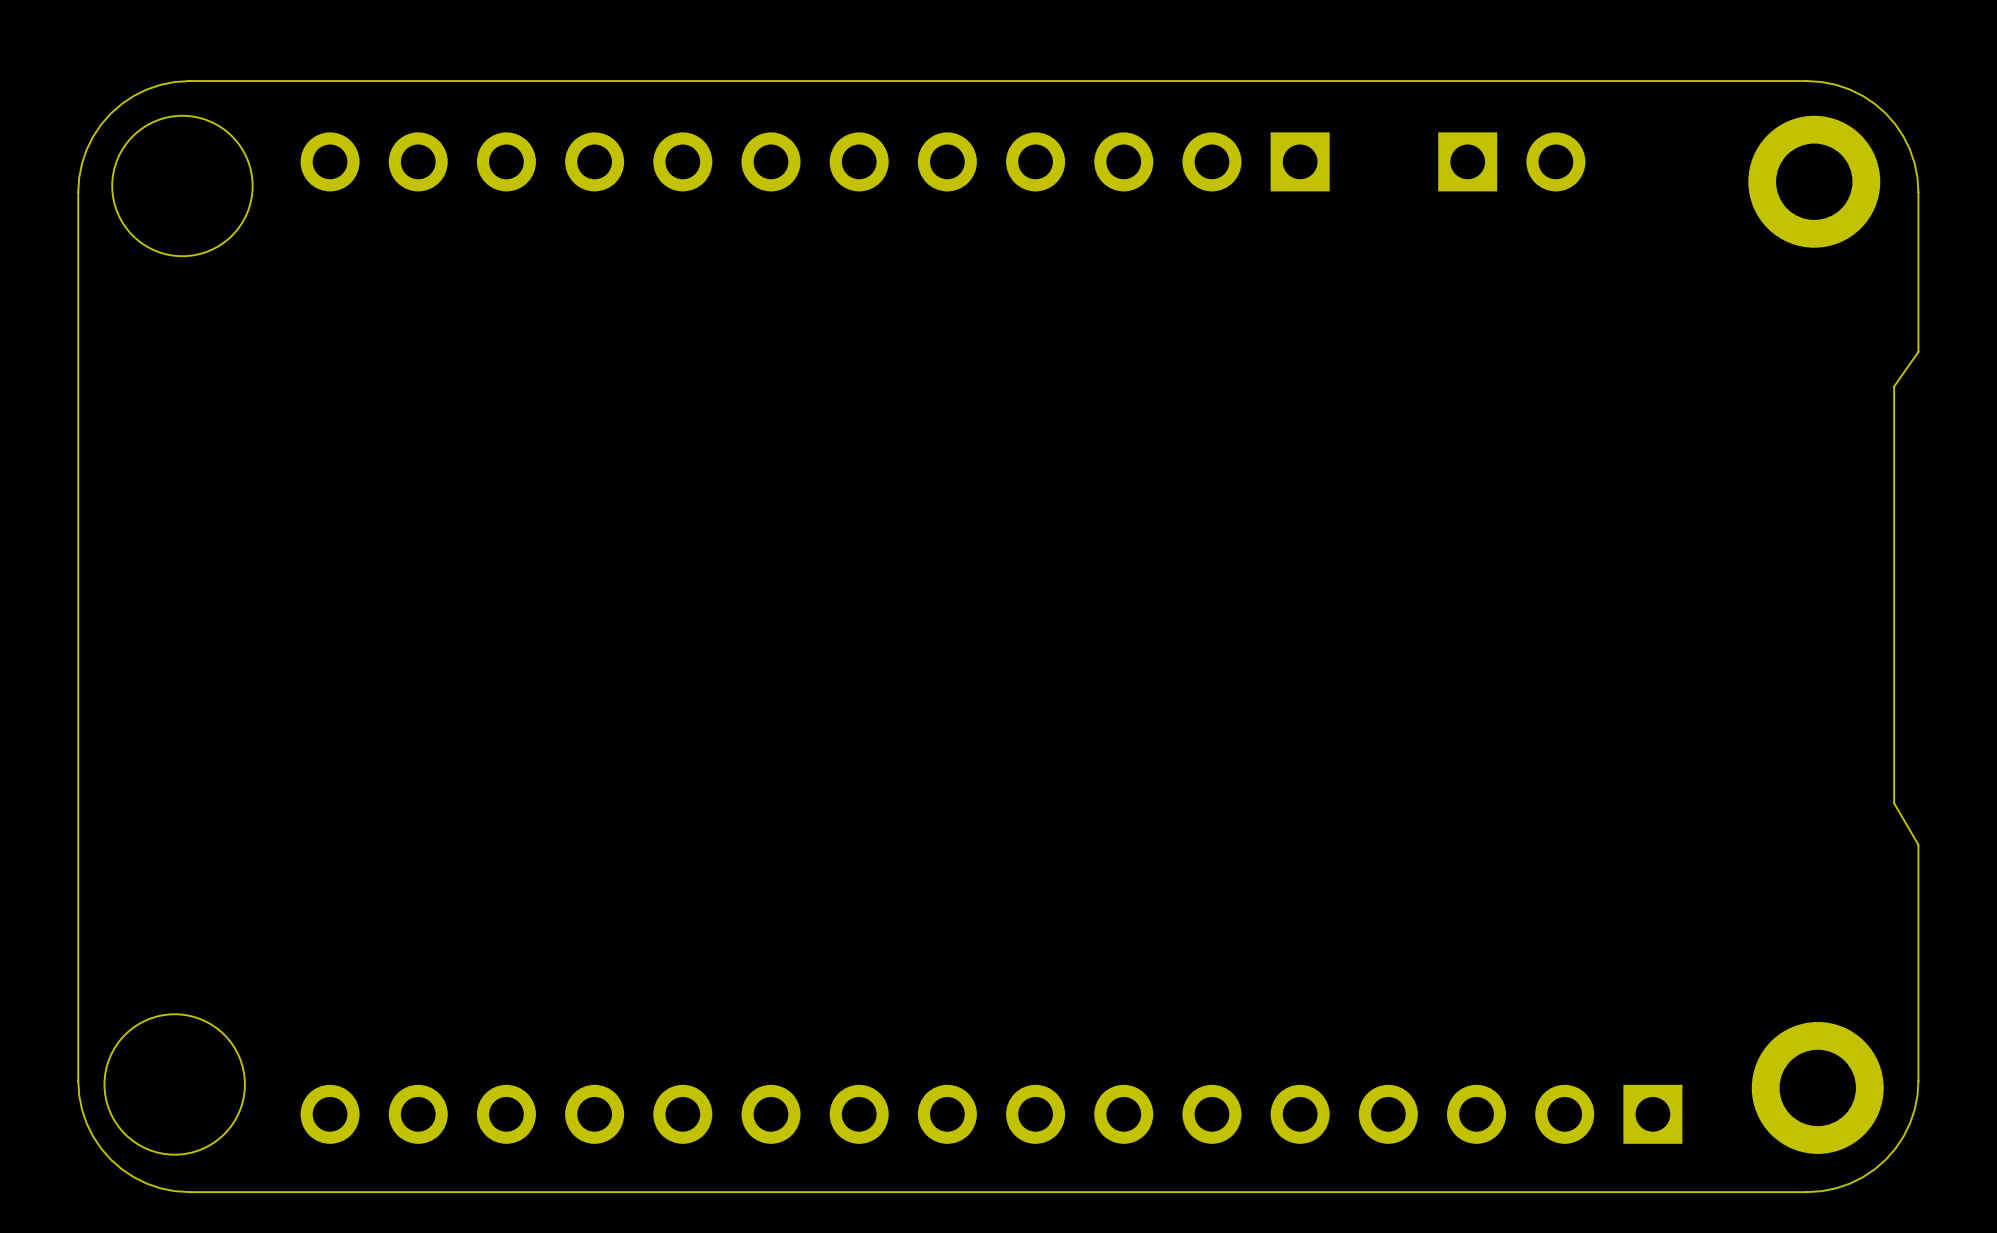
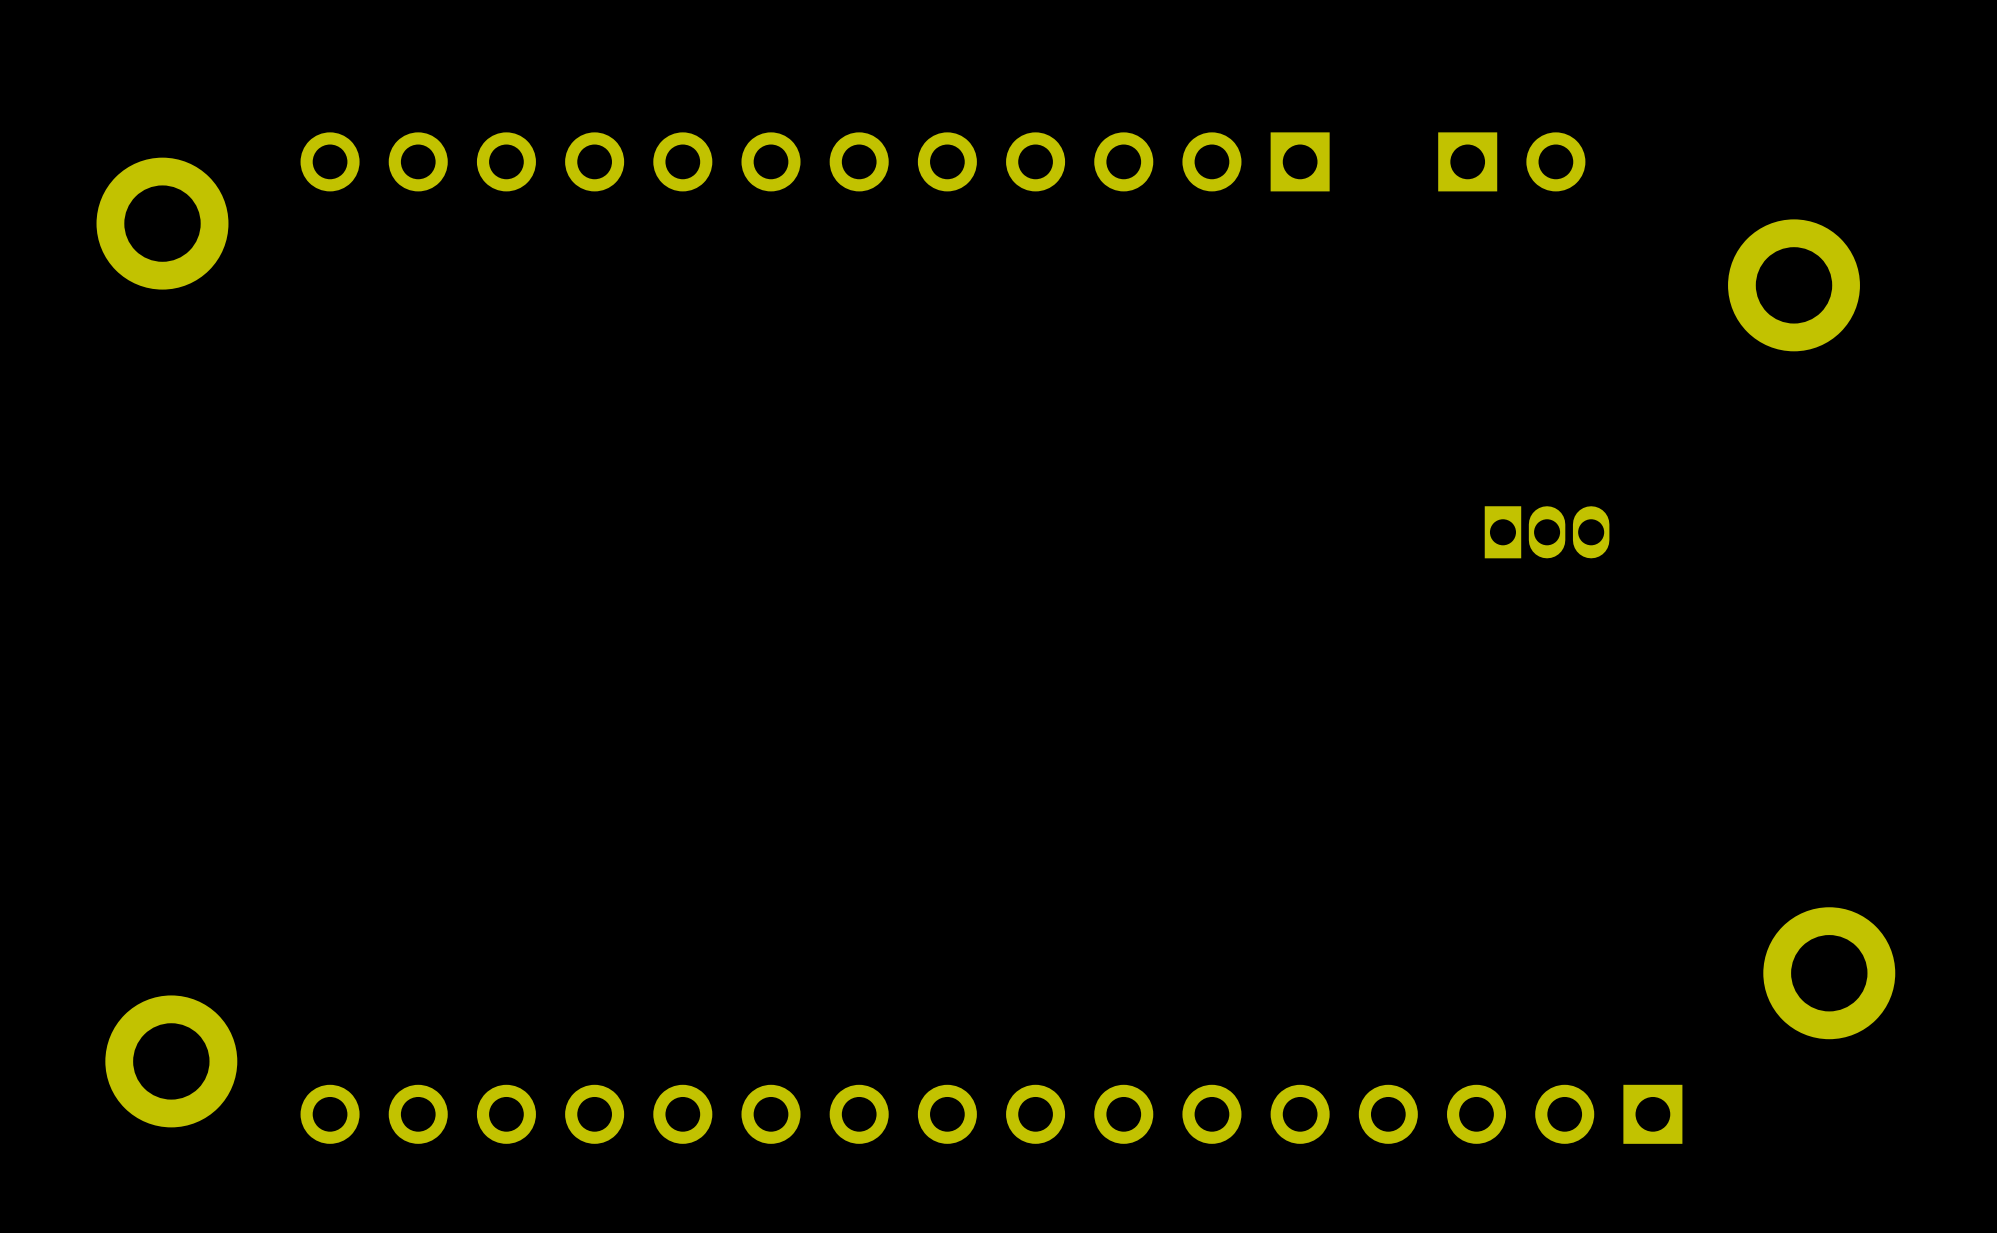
board edge: (1807, 81) (189, 81) (160, 84) (133, 95) (110, 113) (93, 136) (82, 163) (78, 192) (78, 1081) (82, 1109) (93, 1136) (110, 1159) (133, 1177) (160, 1188) (189, 1192) (1807, 1192) (1836, 1188) (1862, 1177) (1885, 1159) (1903, 1136) (1914, 1109) (1918, 1081) (1918, 844) (1894, 803) (1894, 386) (1918, 351) (1918, 192) (1914, 163) (1909, 149) (1903, 136) (1885, 113) (1862, 95) (1849, 89) (1836, 84) (1807, 81) -> none
round board edge: [111, 114, 254, 258] -> none
part position: (1814, 181) -> (1794, 285)
part: none -> (162, 223)
part: none -> (1547, 532)
round board edge: [103, 1013, 246, 1156] -> none
part: none -> (171, 1061)
part position: (1817, 1087) -> (1829, 973)

